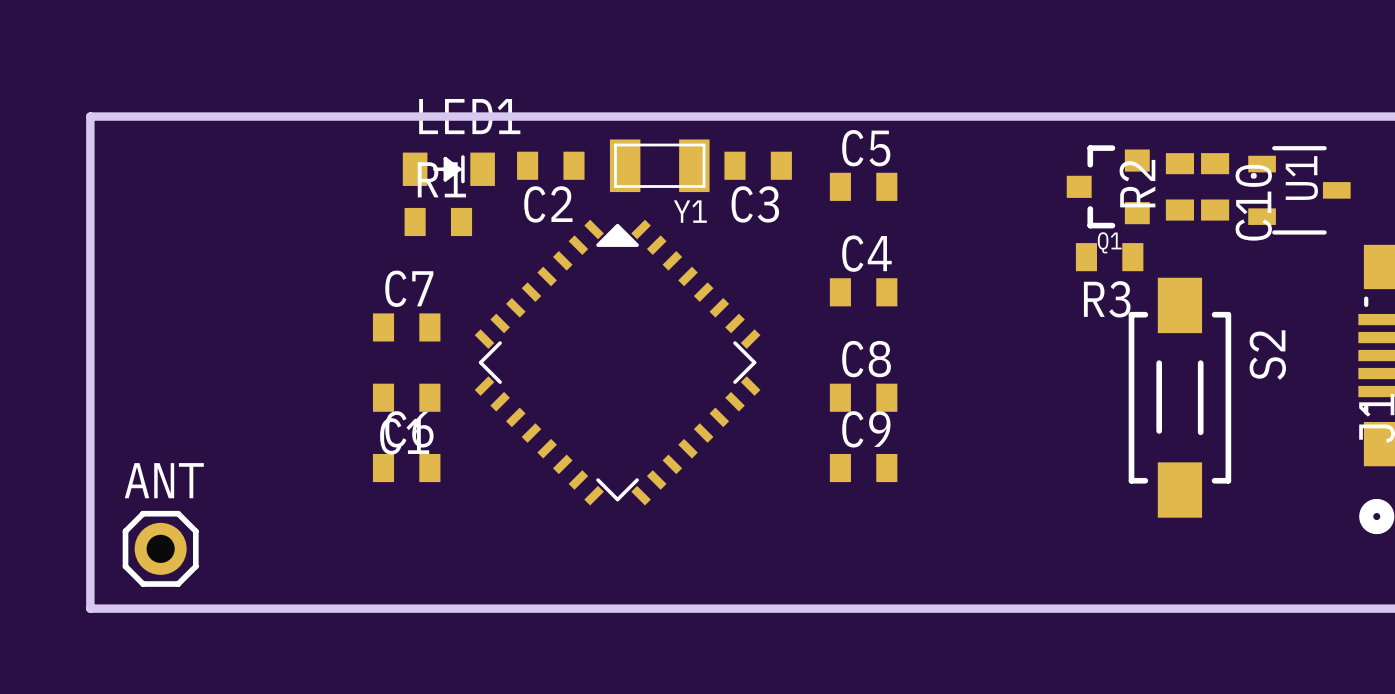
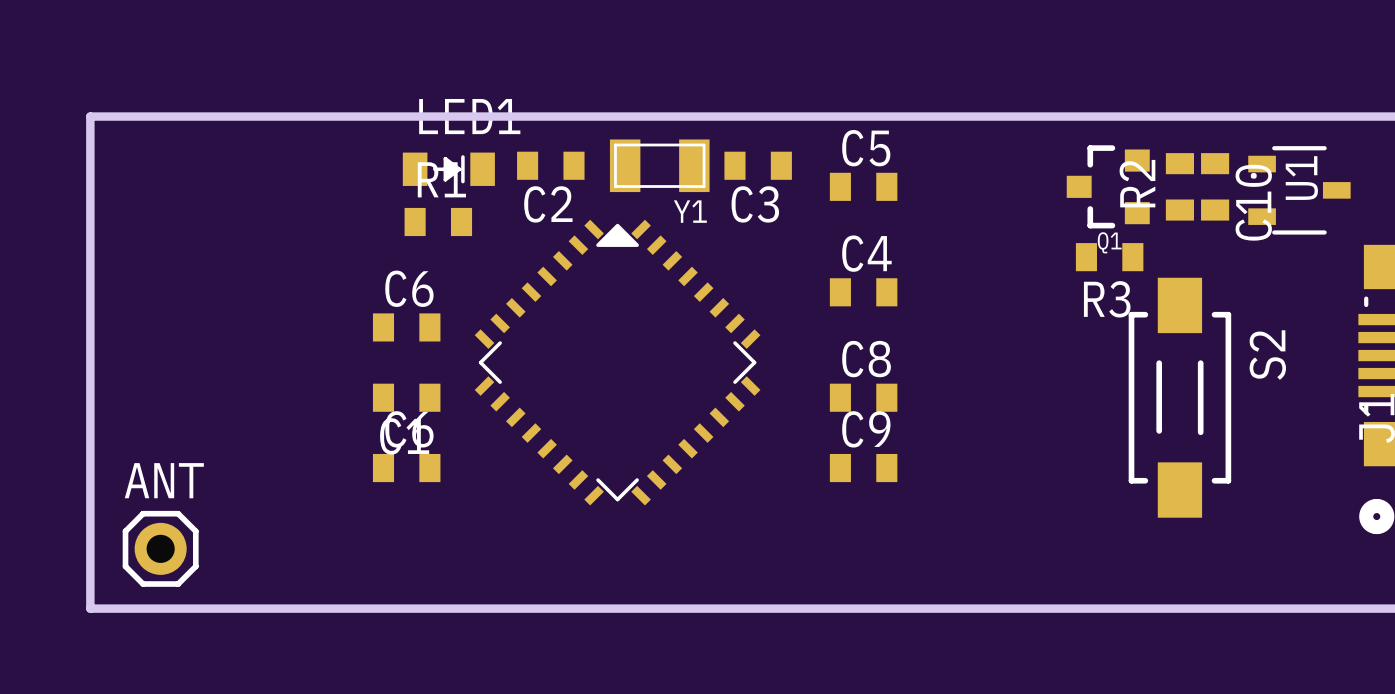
C7 name: C7 (409, 288) -> C6 (409, 288)

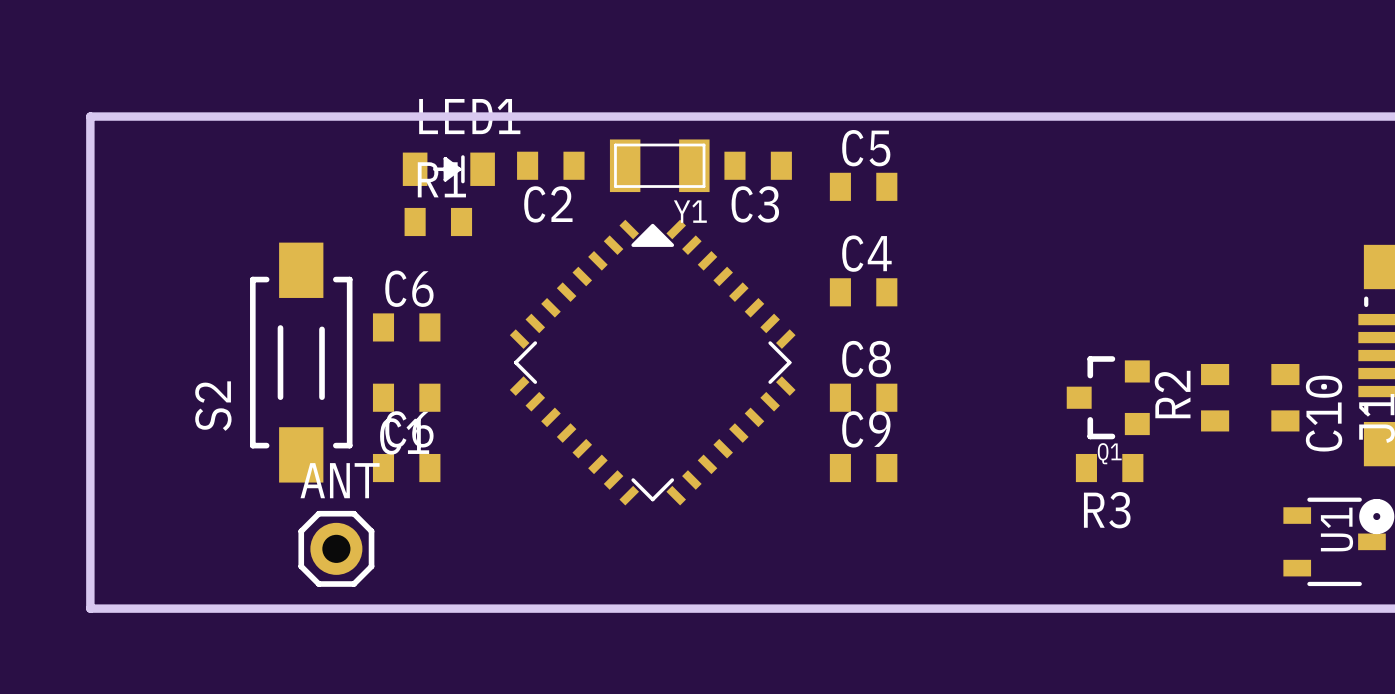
Q1 position: (1108, 186) -> (1108, 397)
R2 position: (1179, 186) -> (1215, 397)
C10 position: (1215, 186) -> (1285, 397)
U1 position: (1299, 190) -> (1334, 541)
R3 position: (1109, 257) -> (1109, 468)
part position: (617, 362) -> (652, 362)
S2 rotation: 0° (1179, 397) -> 180° (301, 362)
S2 position: (1179, 397) -> (301, 362)
ANT position: (160, 548) -> (336, 548)

